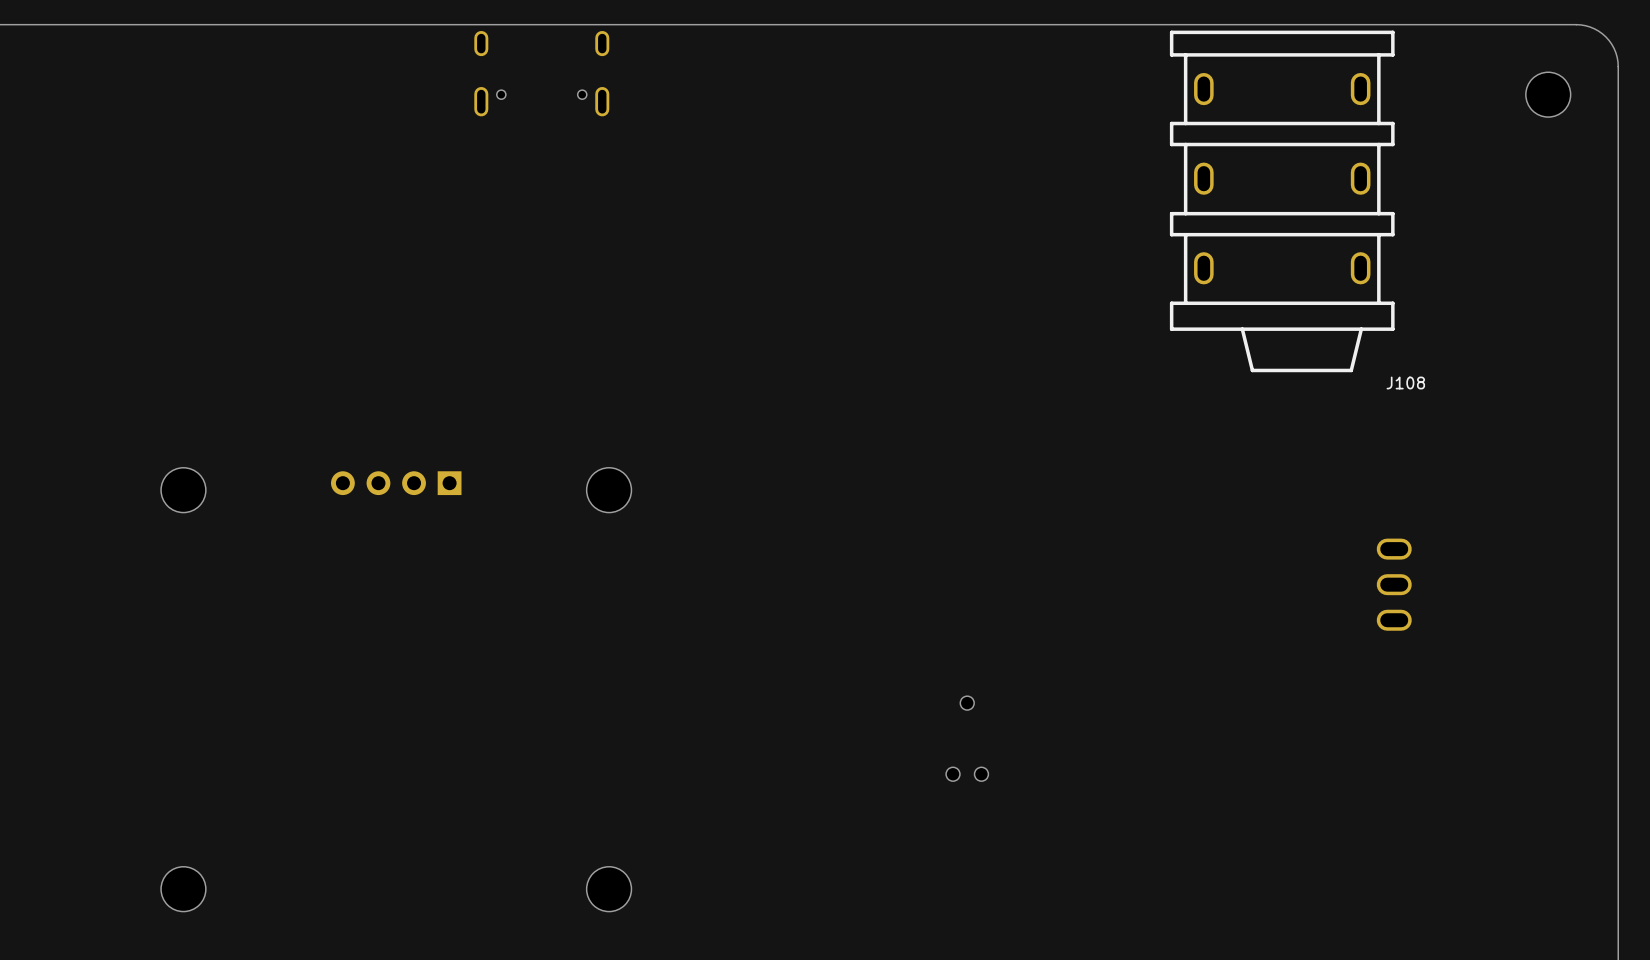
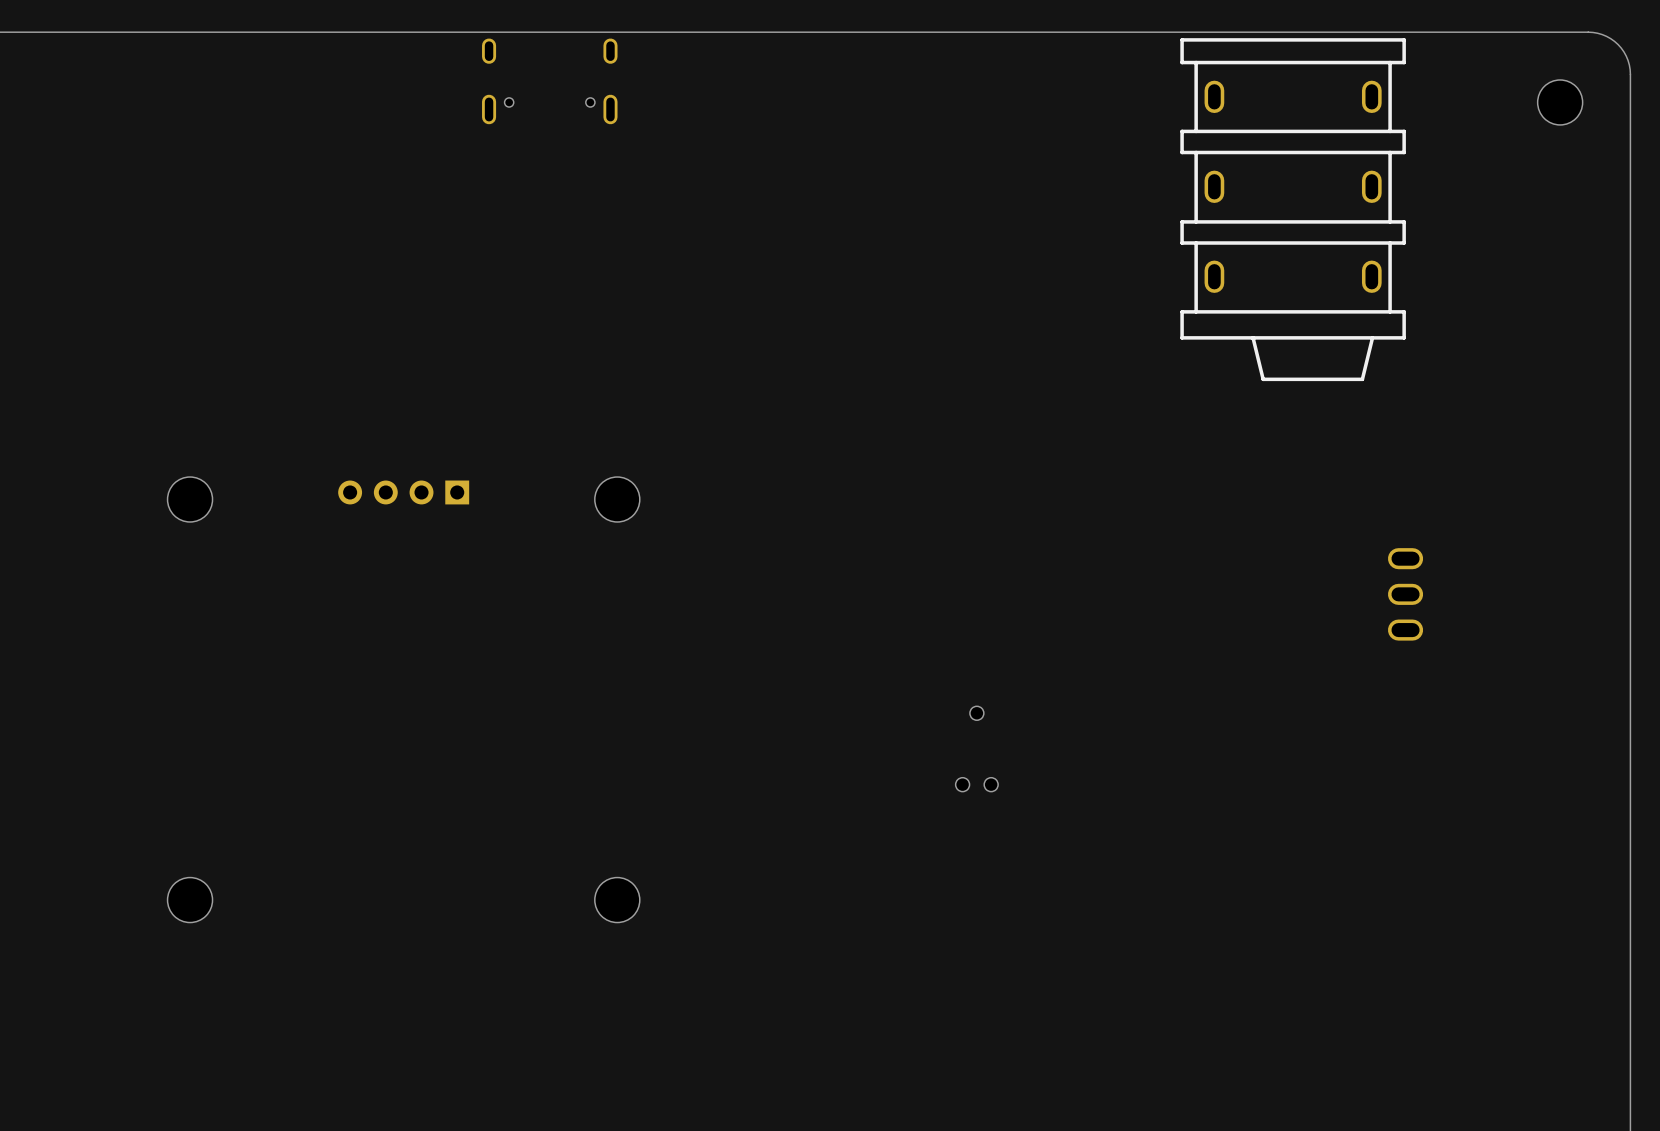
J108 name: J108 (1405, 383) -> none

